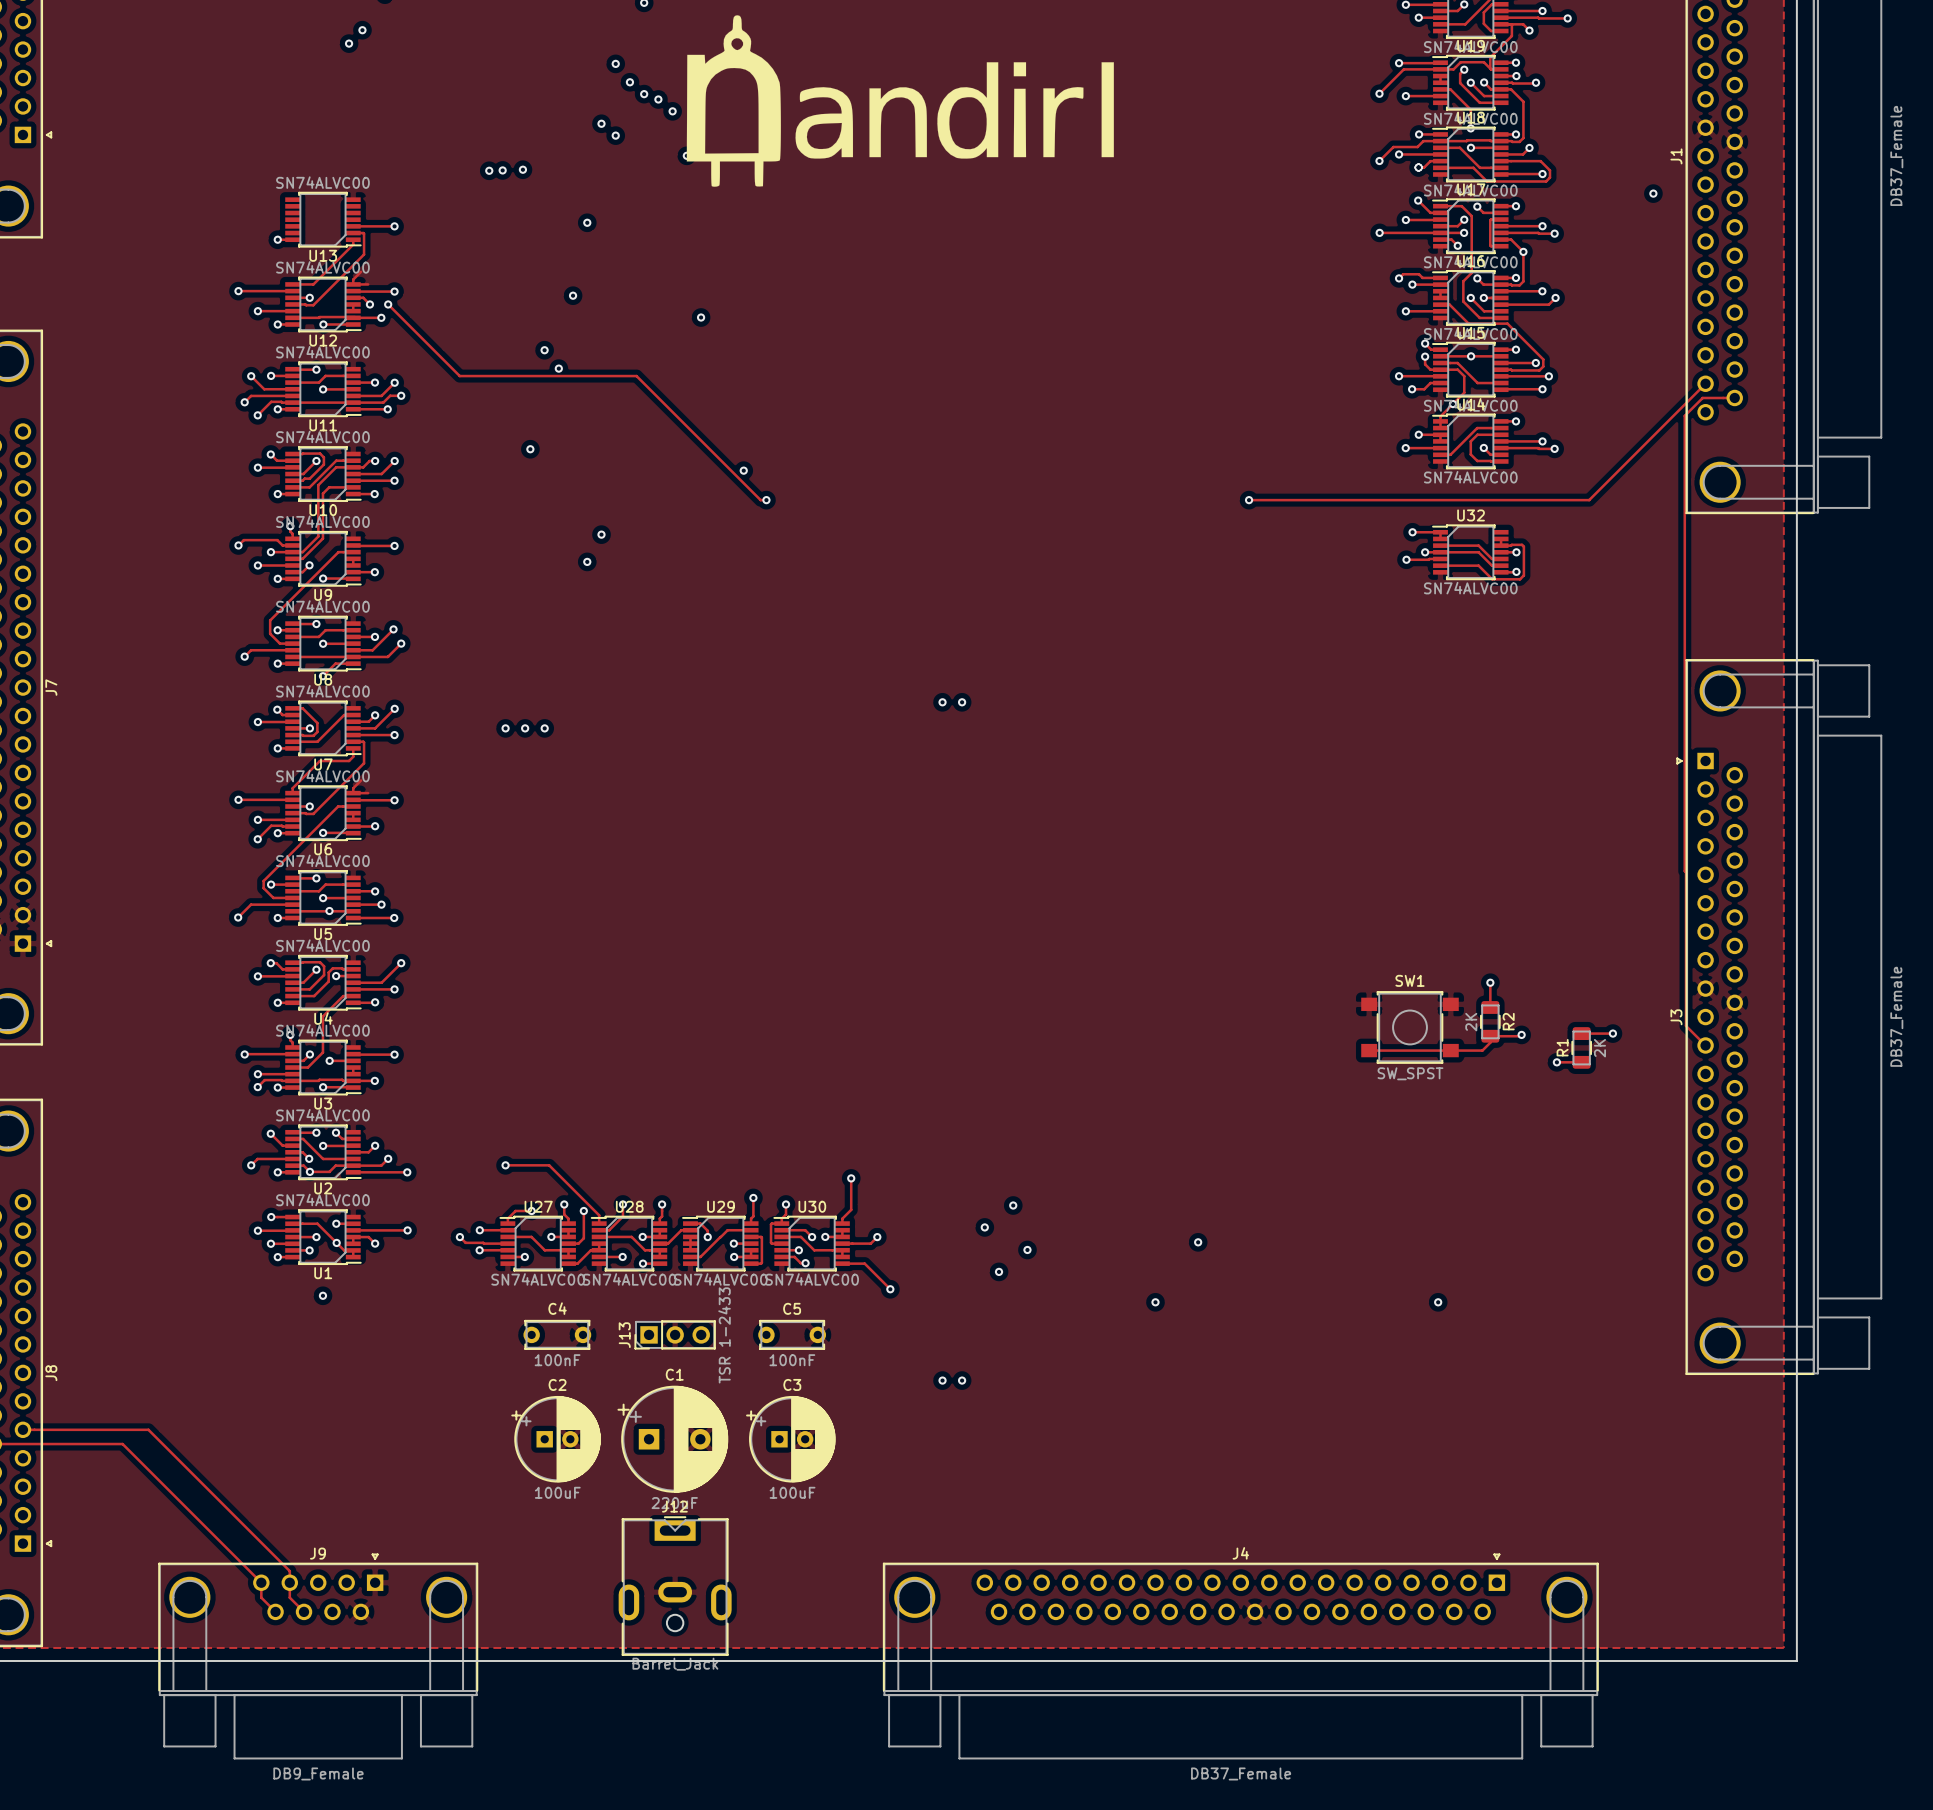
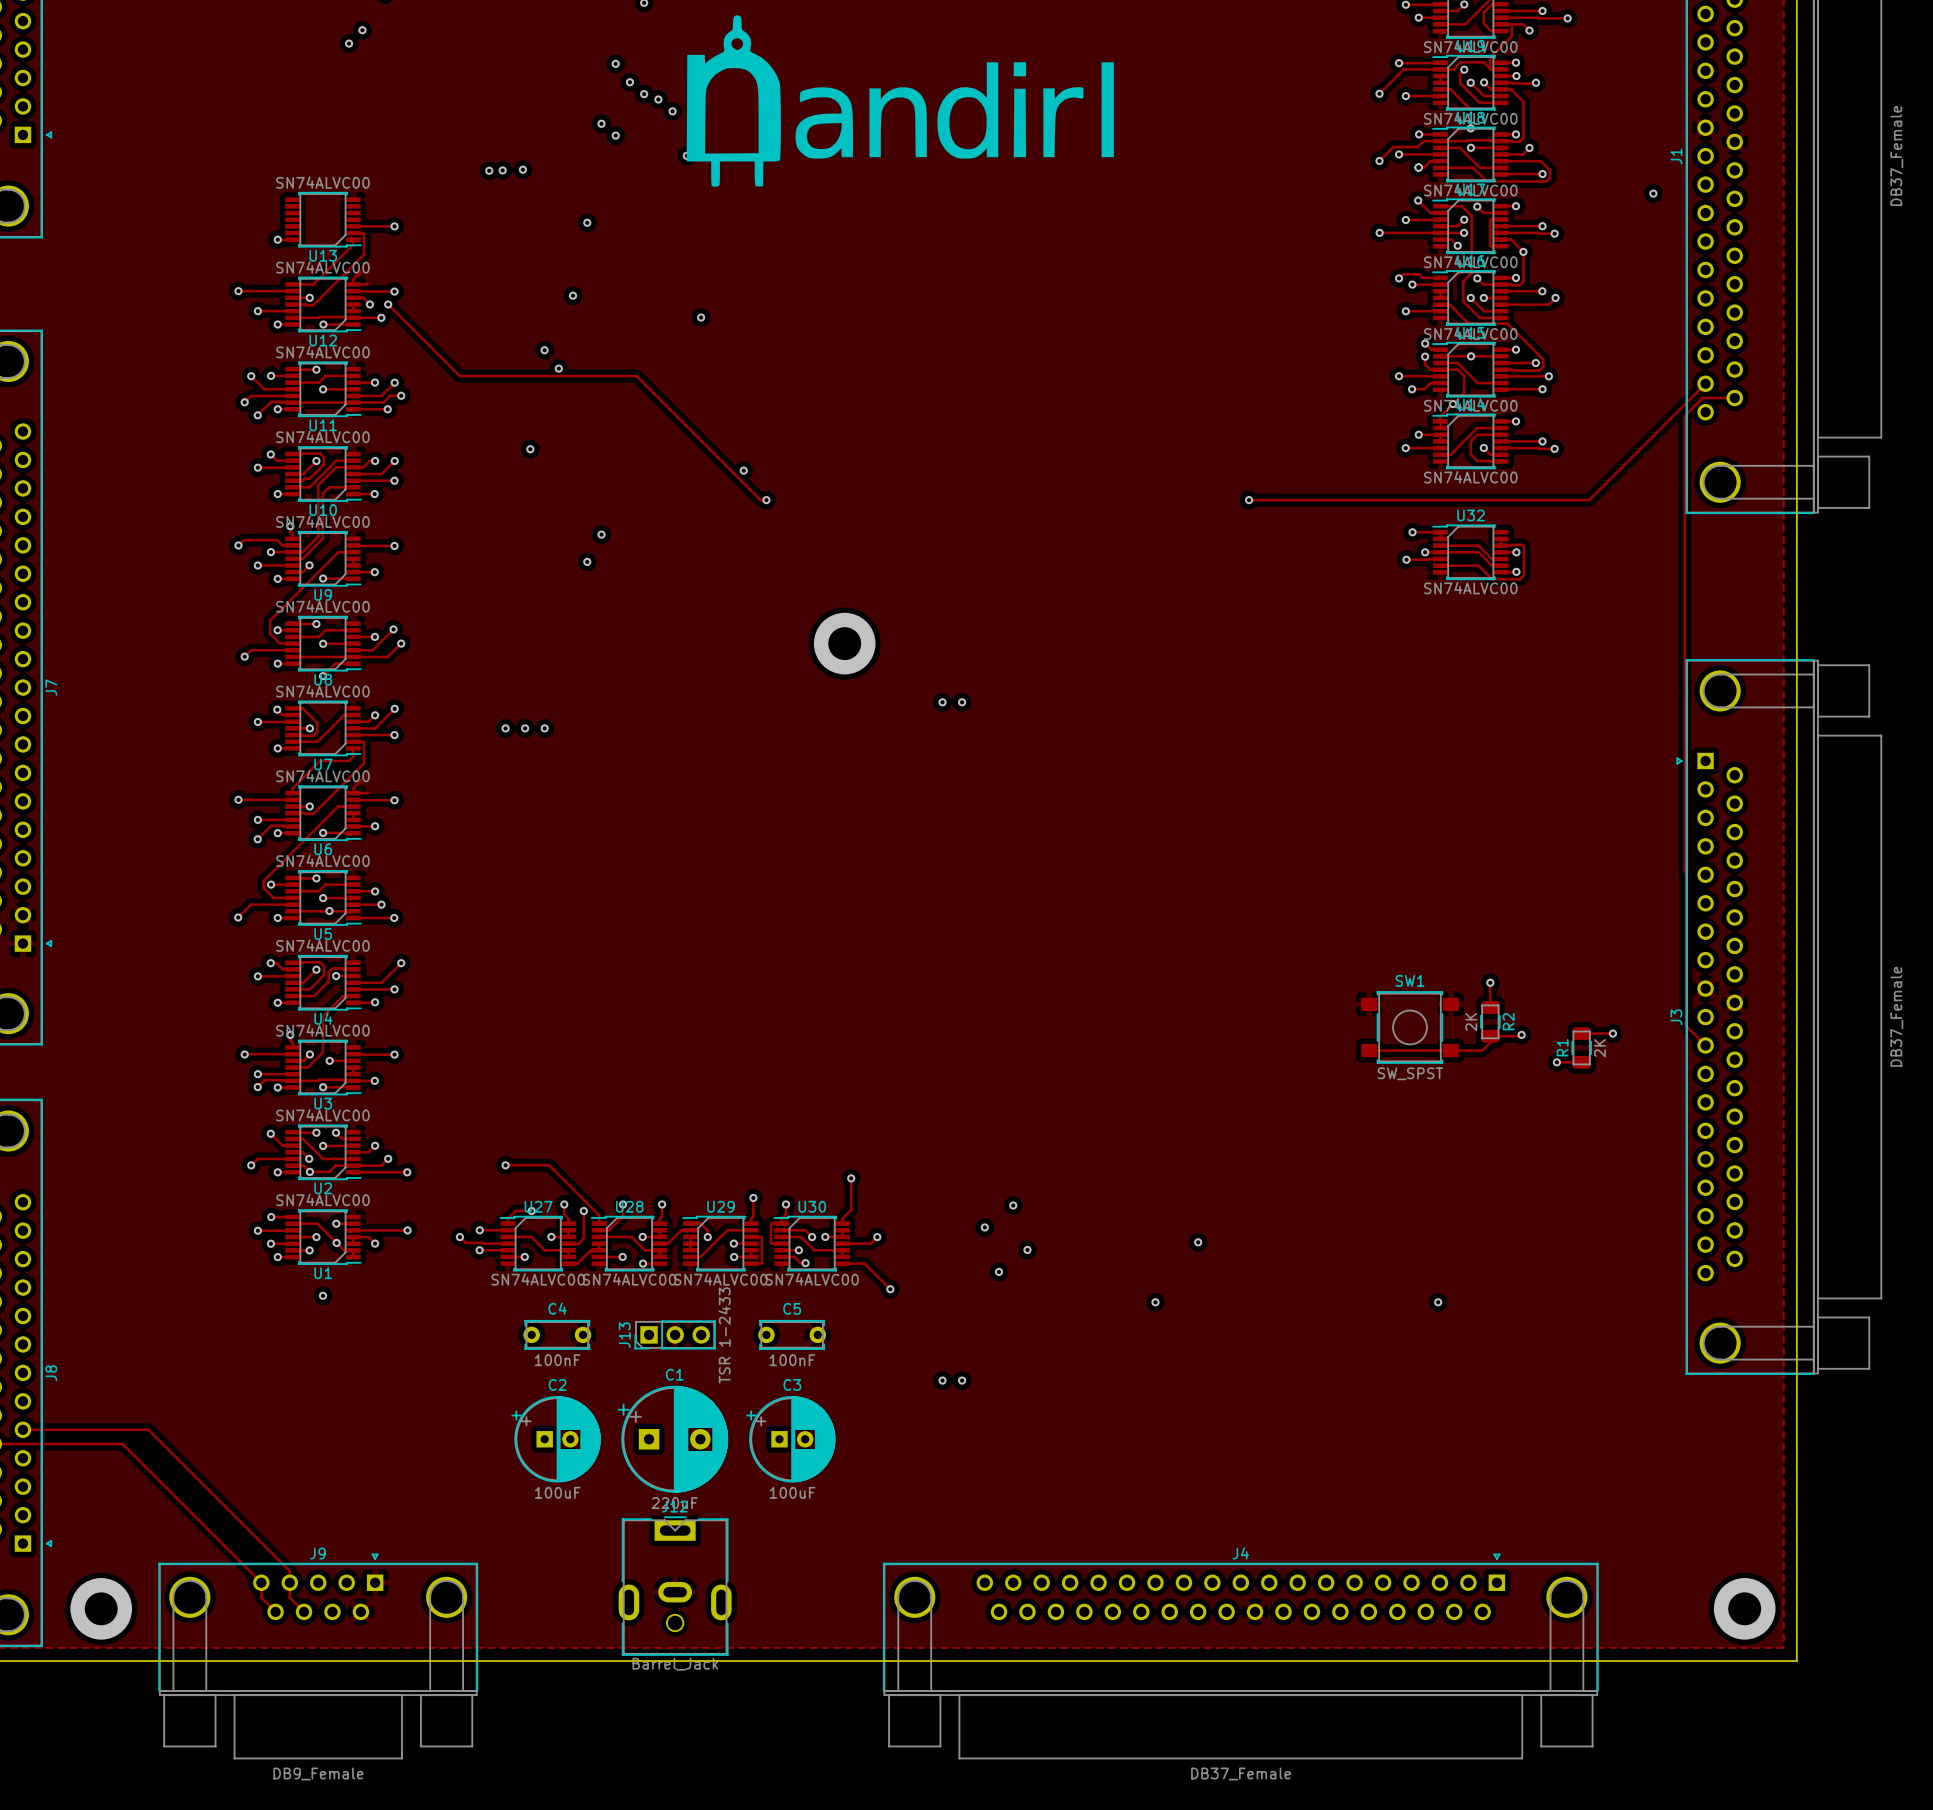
via: none -> (844, 643)
via: none -> (101, 1608)
via: none -> (1744, 1608)

